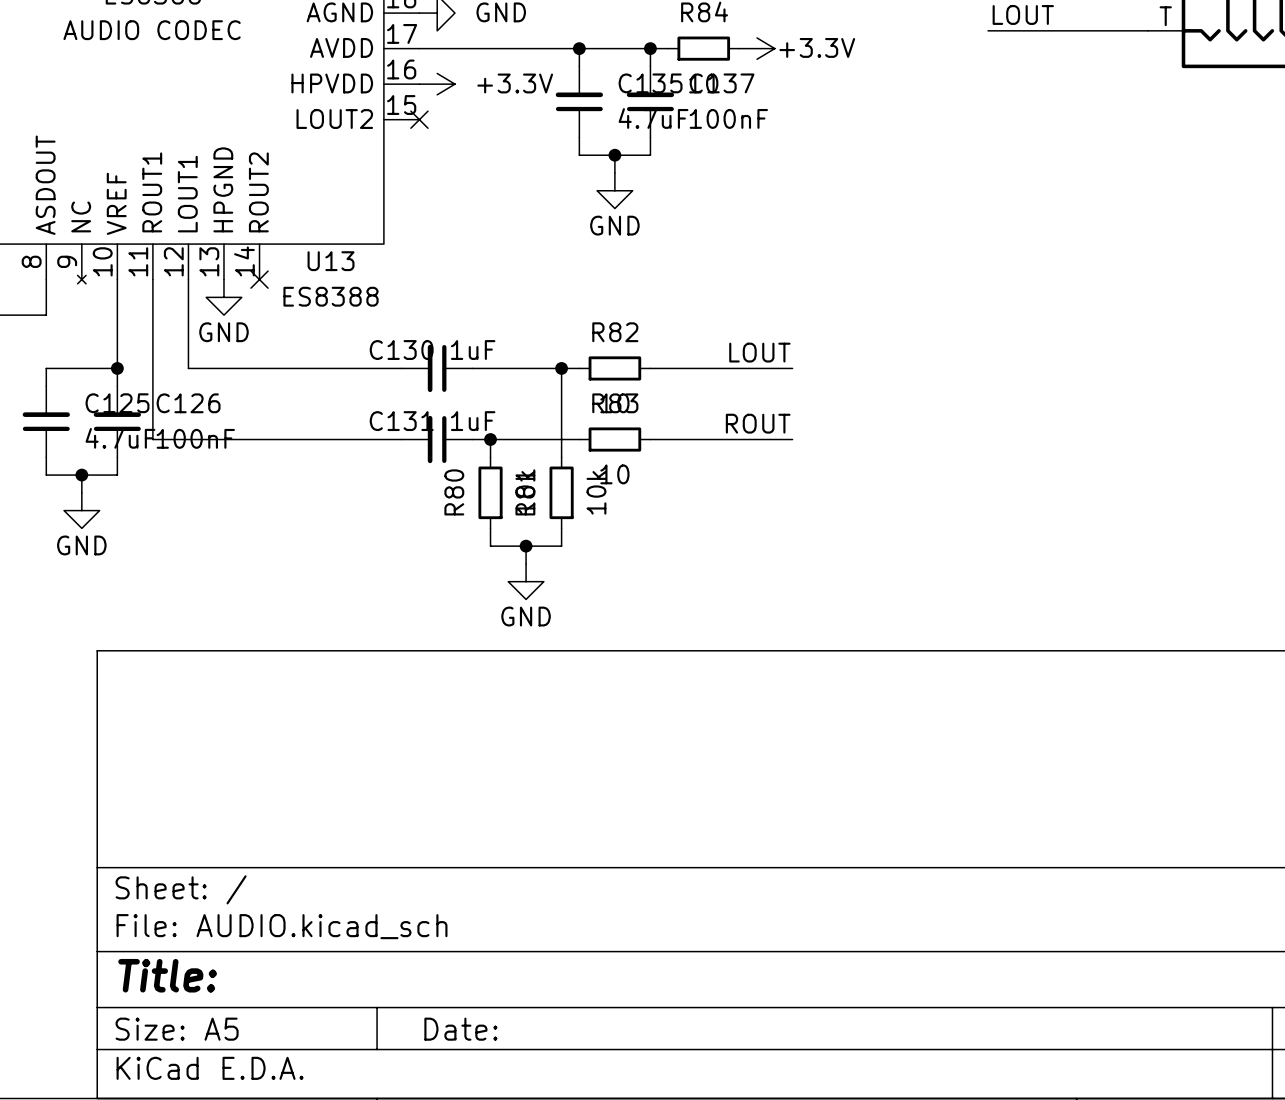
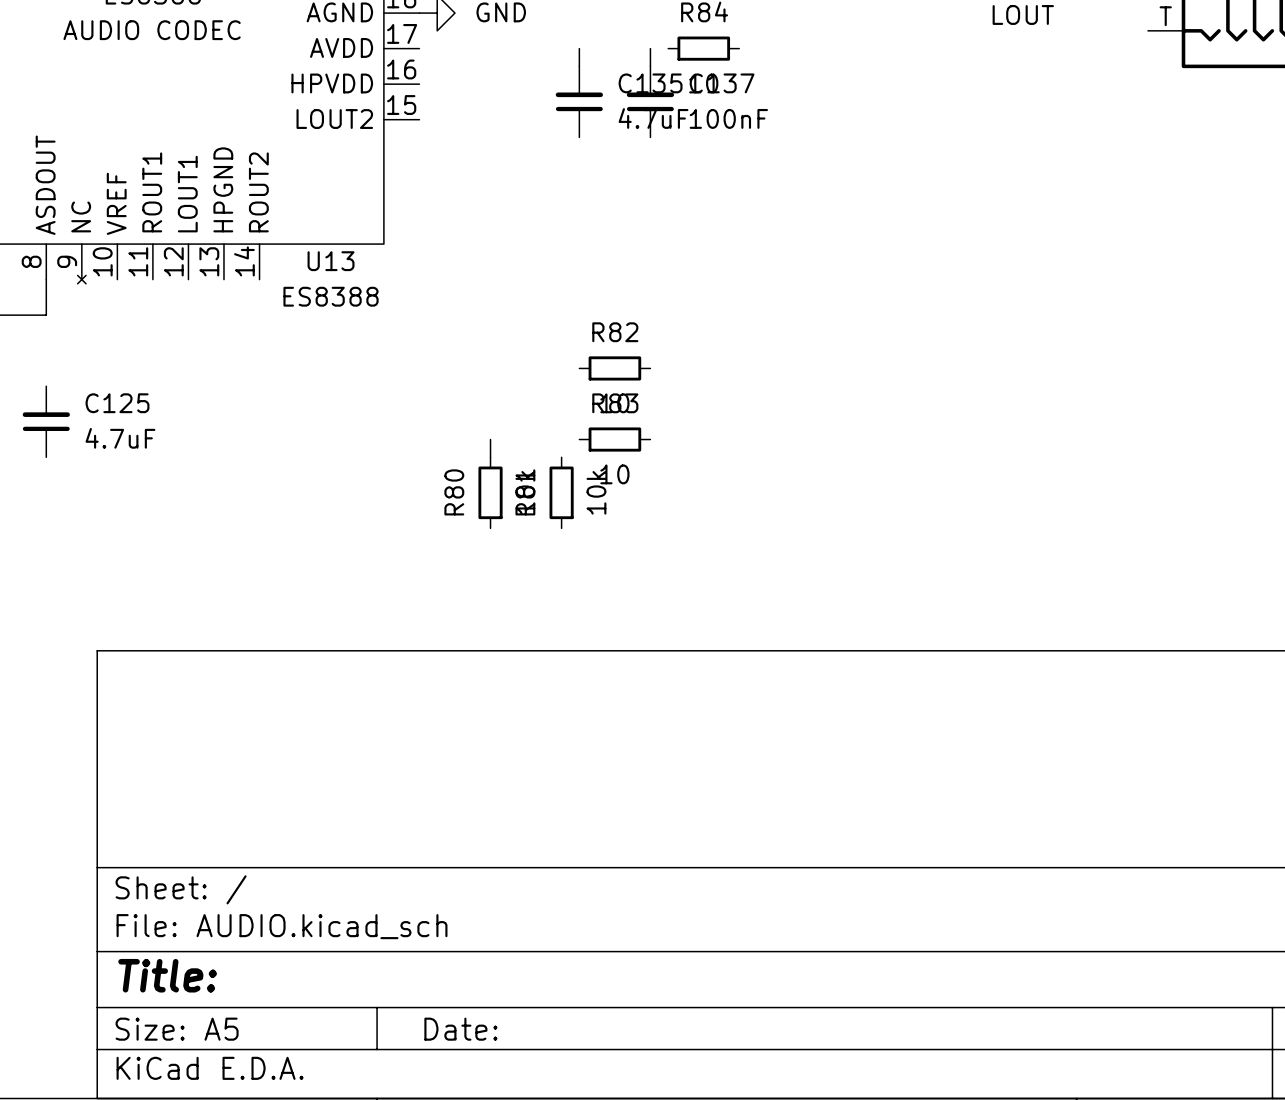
wire: (988, 30) (1147, 30) -> none
wire: (419, 48) (668, 48) -> none
junction: (579, 48) -> none
junction: (650, 48) -> none
power symbol: +3.3V (757, 48) -> none
power symbol: +3.3V (437, 84) -> none
no-connect mark: (419, 119) -> none
wire: (579, 137) (579, 155) (650, 155) (650, 137) -> none
wire: (614, 155) (614, 172) -> none
junction: (614, 155) -> none
power symbol: GND (614, 190) -> none
wire: (117, 279) (117, 386) -> none
wire: (152, 279) (152, 439) (401, 439) -> none
wire: (188, 279) (188, 368) (401, 368) -> none
no-connect mark: (259, 279) -> none
power symbol: GND (223, 297) -> none
label: LOUT (759, 352) -> none
wire: (117, 368) (46, 368) (46, 386) -> none
junction: (117, 368) -> none
C130: 1uF (437, 368) -> none
wire: (472, 368) (579, 368) -> none
wire: (561, 368) (561, 457) -> none
junction: (561, 368) -> none
wire: (650, 368) (792, 368) -> none
C126: 100nF (117, 421) -> none
label: ROUT (758, 423) -> none
C131: 1uF (437, 439) -> none
wire: (472, 439) (579, 439) -> none
junction: (490, 439) -> none
wire: (650, 439) (792, 439) -> none
wire: (46, 457) (46, 475) (117, 475) (117, 457) -> none
wire: (81, 475) (81, 492) -> none
junction: (81, 475) -> none
power symbol: GND (81, 510) -> none
wire: (490, 528) (490, 546) (561, 546) (561, 528) -> none
wire: (526, 546) (526, 563) -> none
junction: (526, 546) -> none
power symbol: GND (526, 581) -> none

